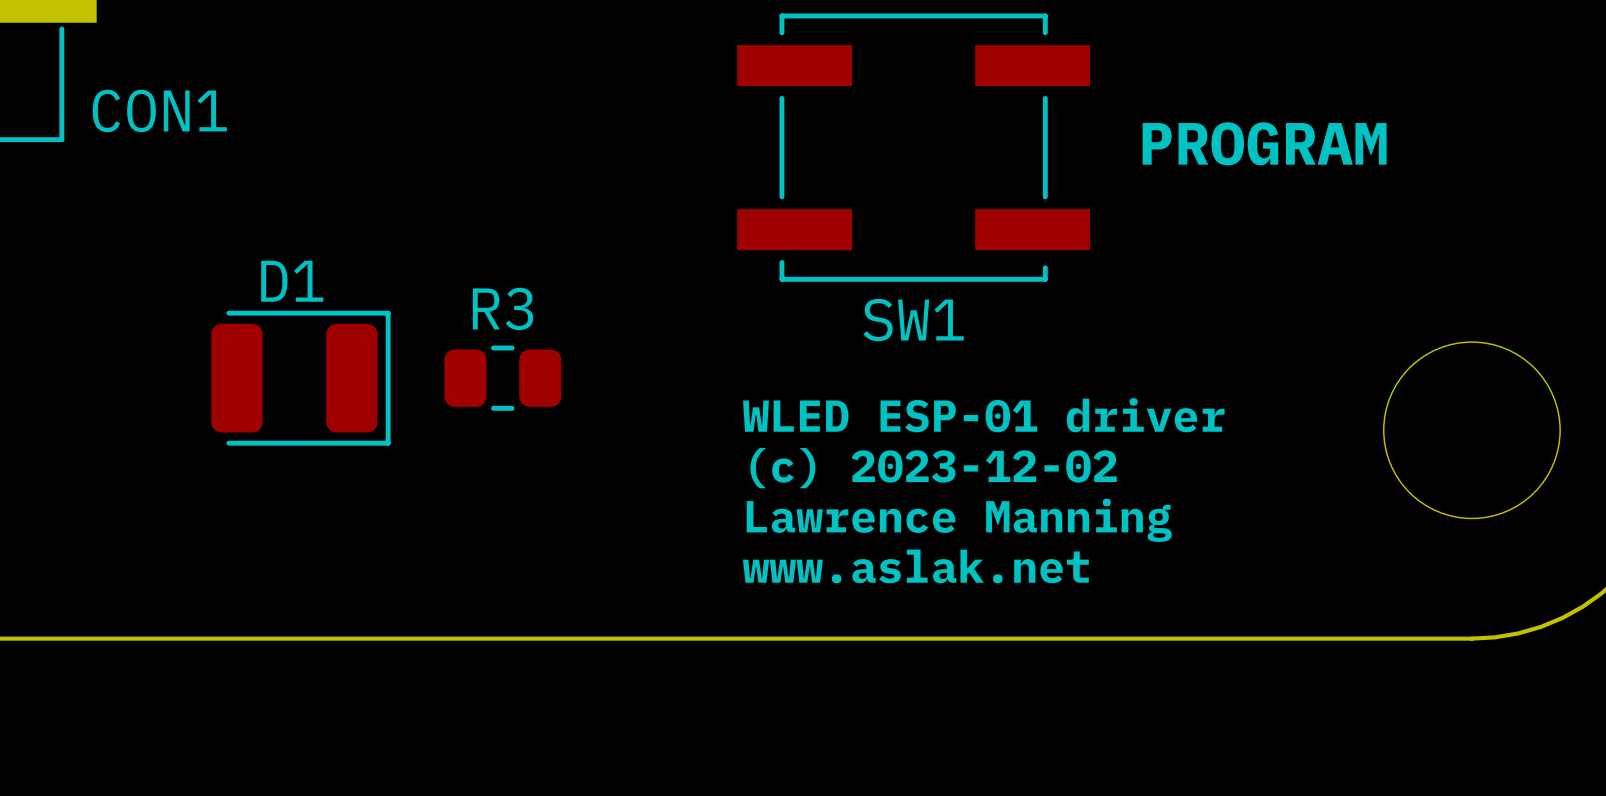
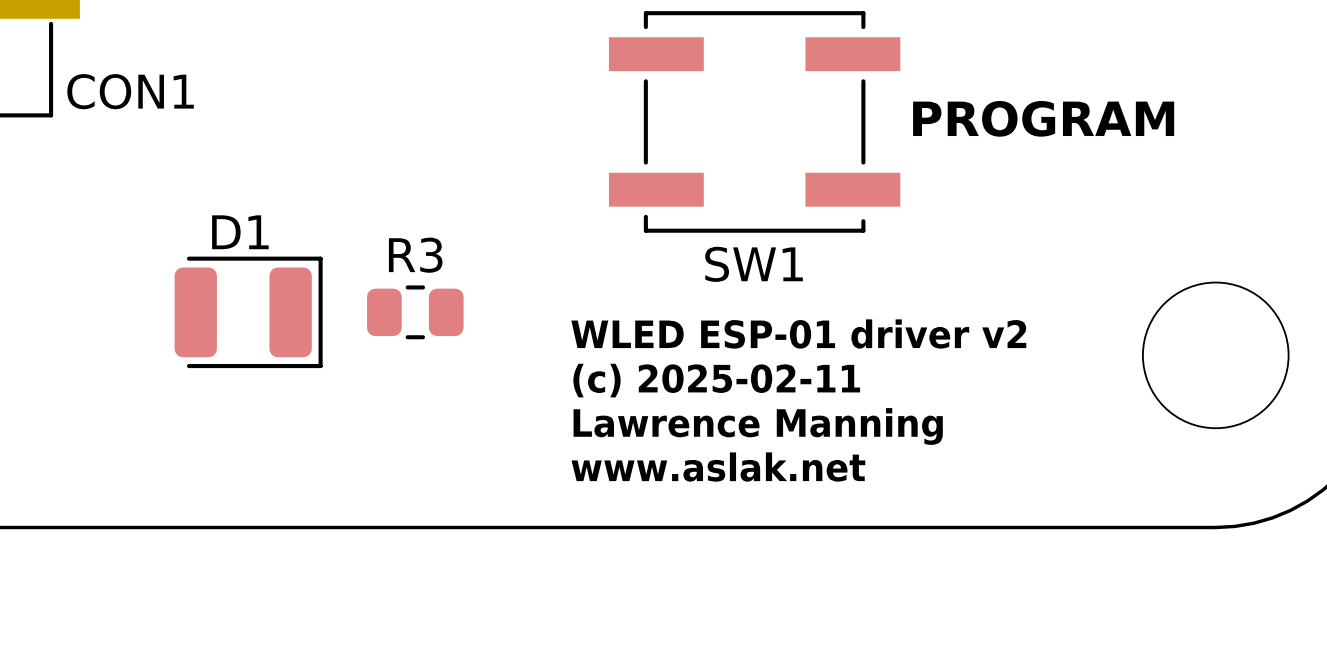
text: WLED ESP-01 driver (983, 415) -> WLED ESP-01 driver v2 (798, 334)
text: (c) 2023-12-02 (933, 468) -> (c) 2025-02-11 (716, 380)
text position: Lawrence Manning (959, 520) -> Lawrence Manning (758, 426)
text position: www.aslak.net (915, 566) -> www.aslak.net (718, 467)

